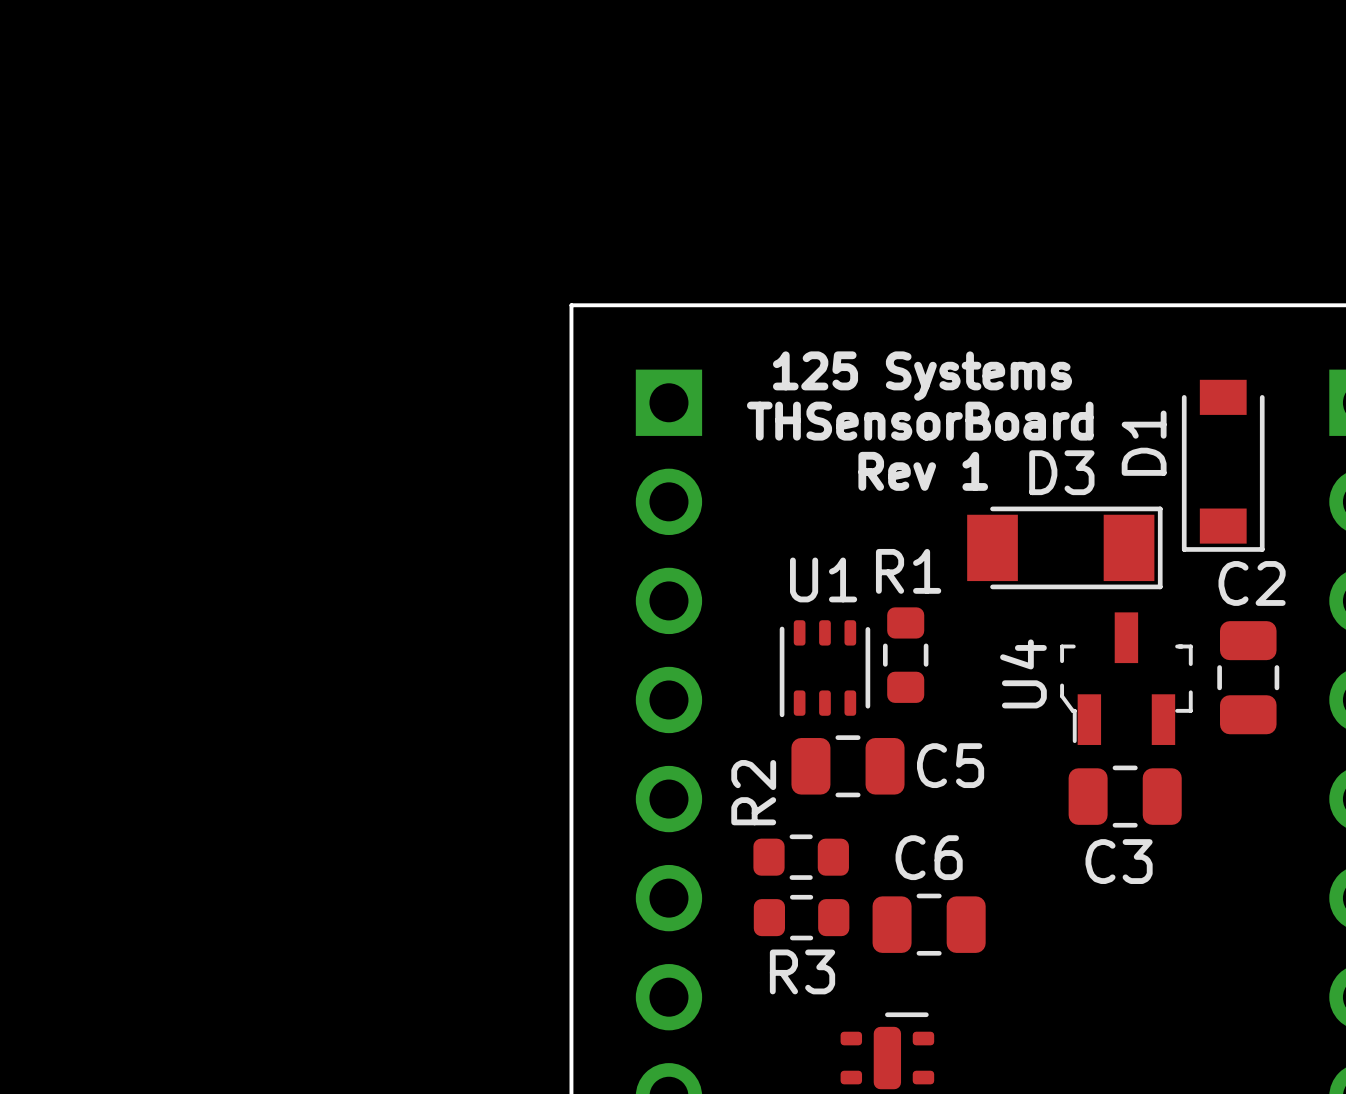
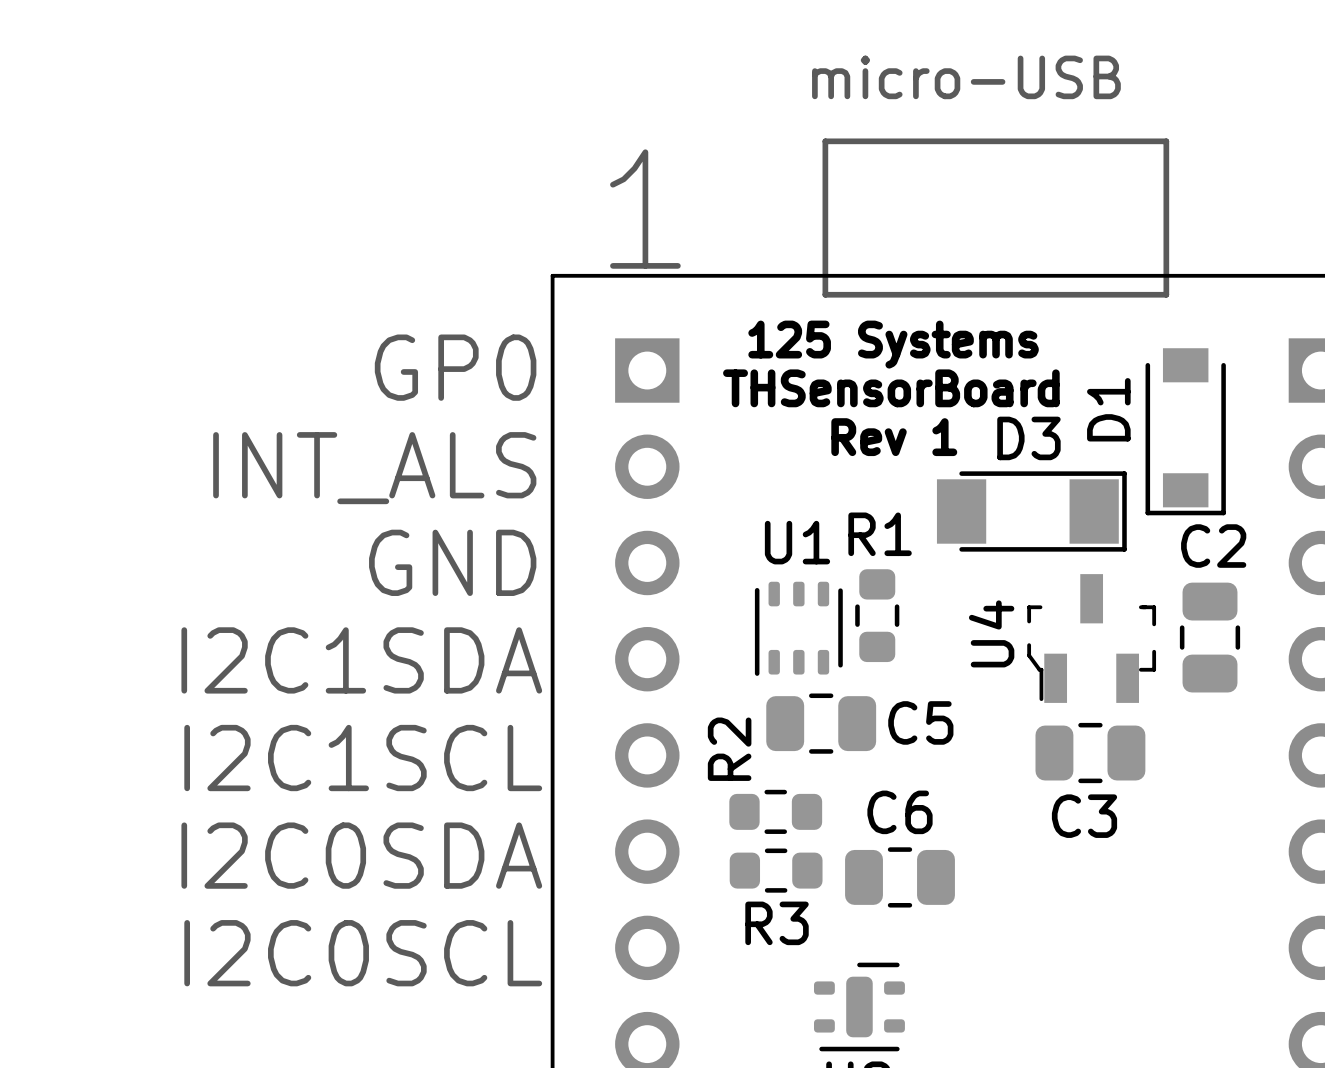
text: none -> micro-USB (966, 77)
line: none -> (825, 141) (1166, 141) (1166, 294) (825, 294) (825, 141)
text: none -> 1 (645, 209)
text: none -> GP0 (455, 367)
text: none -> INT_ALS (374, 468)
text: none -> GND (452, 562)
text: none -> I2C1SDA (361, 660)
text: none -> I2C1SCL (363, 758)
text: none -> I2C0SDA (361, 855)
text: none -> I2C0SCL (363, 953)

